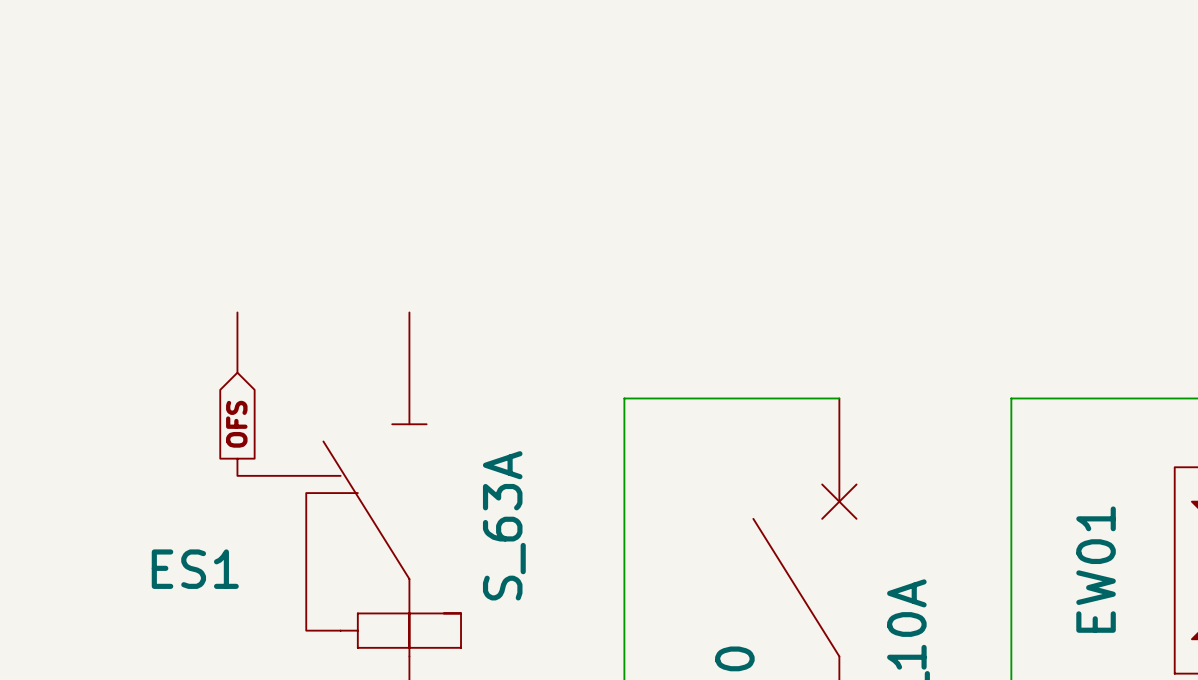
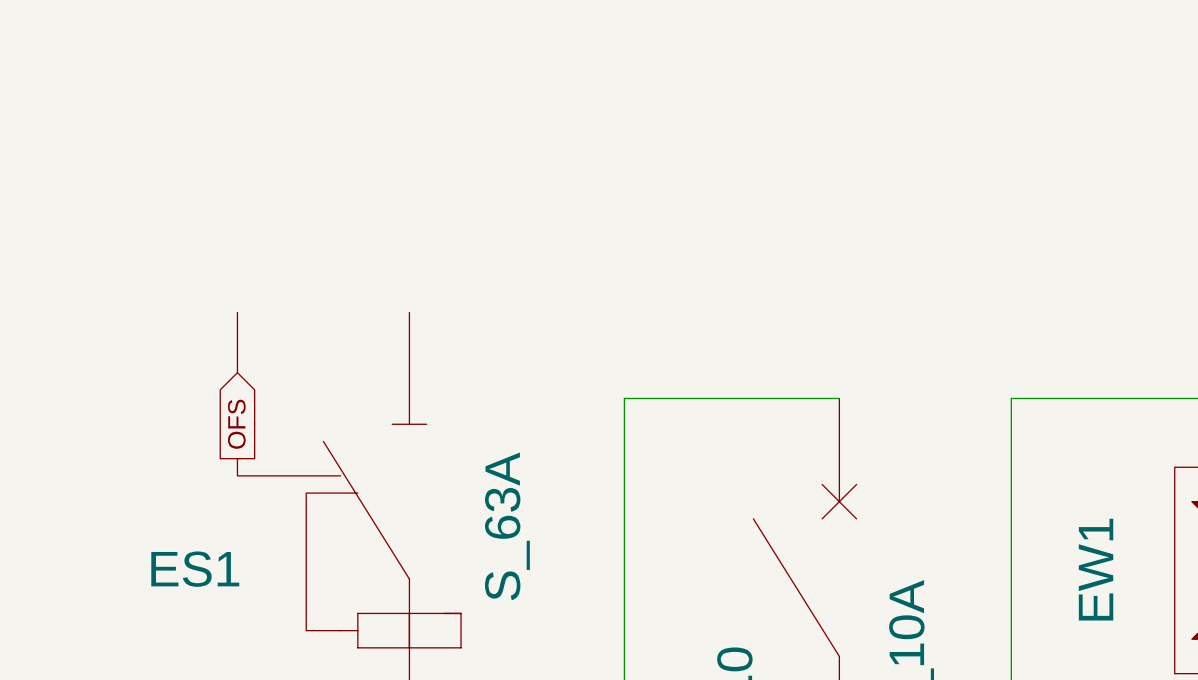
EW01 name: EW01 (1096, 569) -> EW1 (1096, 569)

